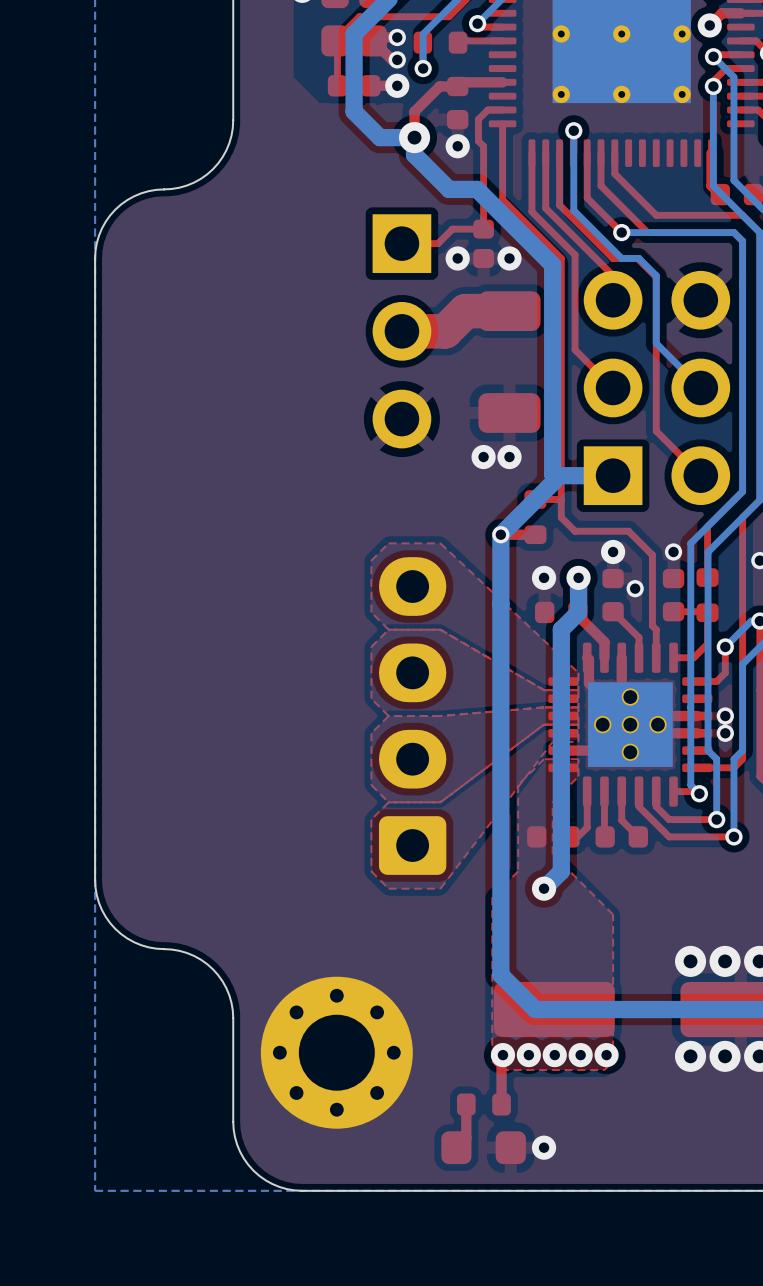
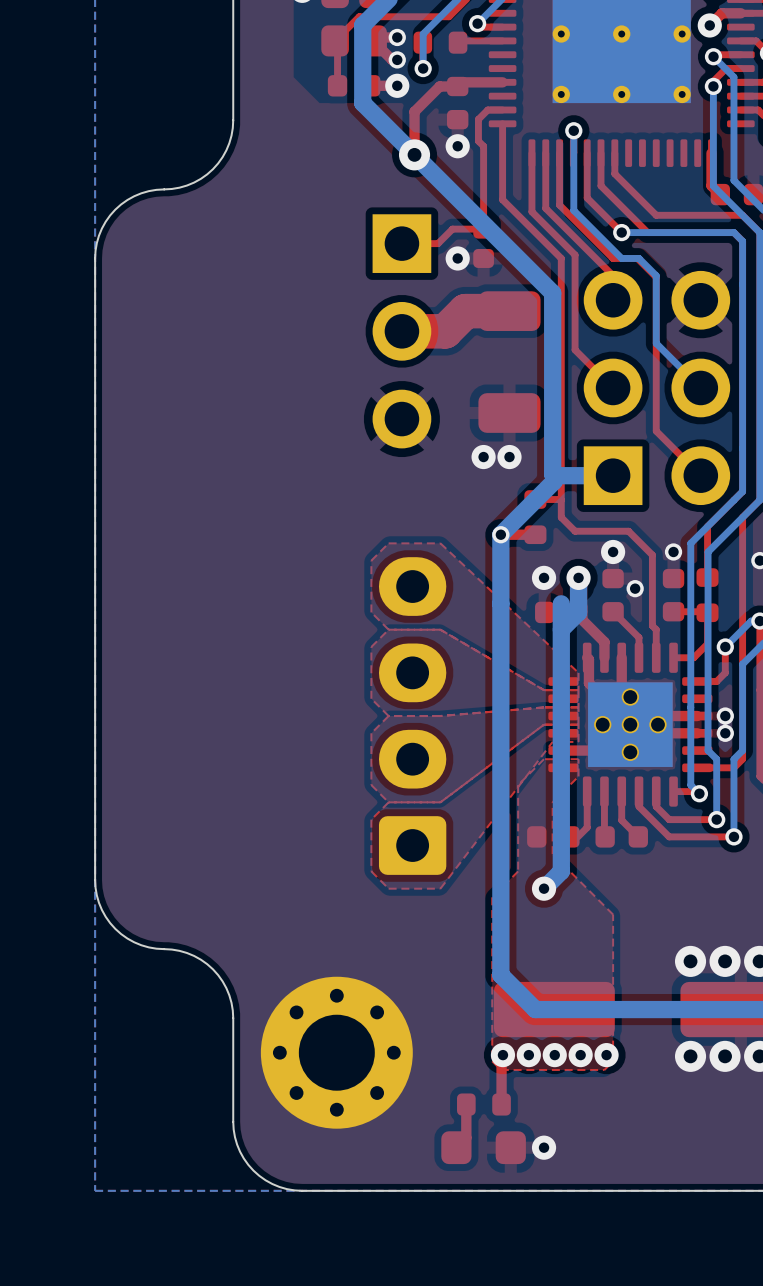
bottom track: (362, 25) (354, 34) (354, 111) (380, 137) (414, 137) (414, 154) -> (362, 25) (362, 103) (414, 154)
via position: (414, 137) -> (414, 154)
bottom track: (449, 189) (477, 189) (552, 264) (552, 293) -> (449, 189) (552, 293)
via: (509, 258) -> none
bottom track: (561, 629) (561, 871) -> (561, 603) (561, 871)

